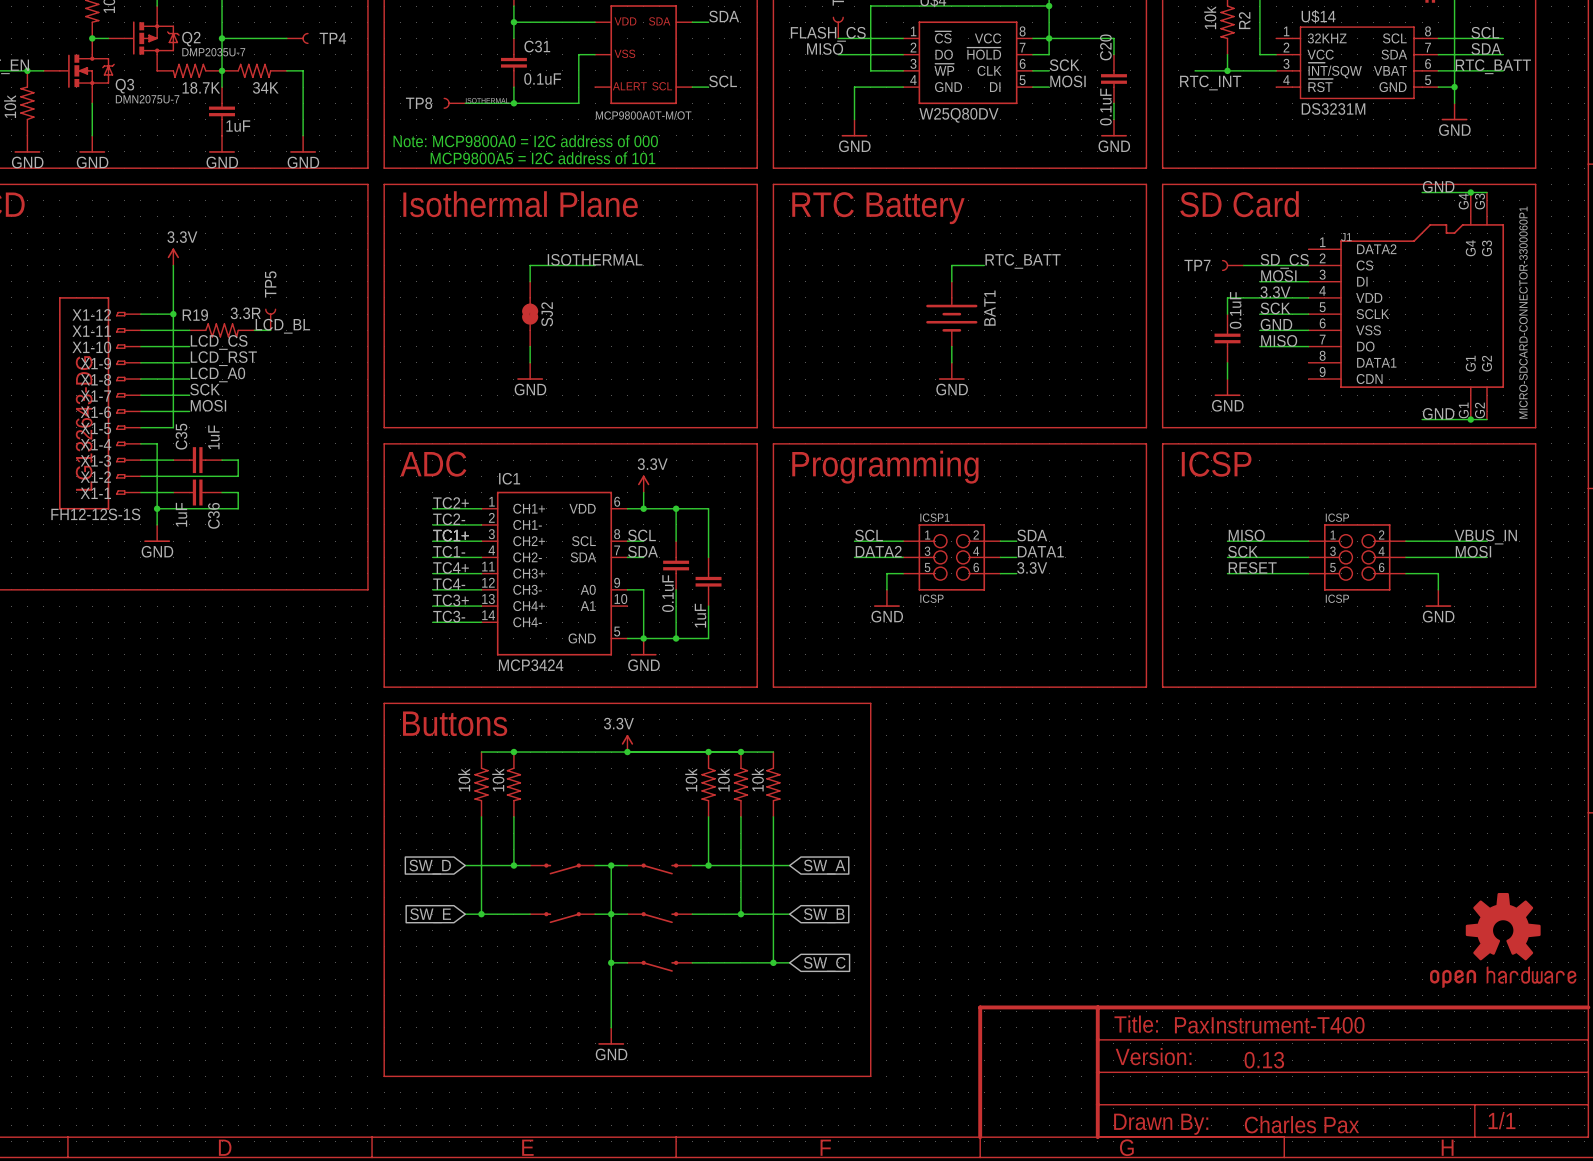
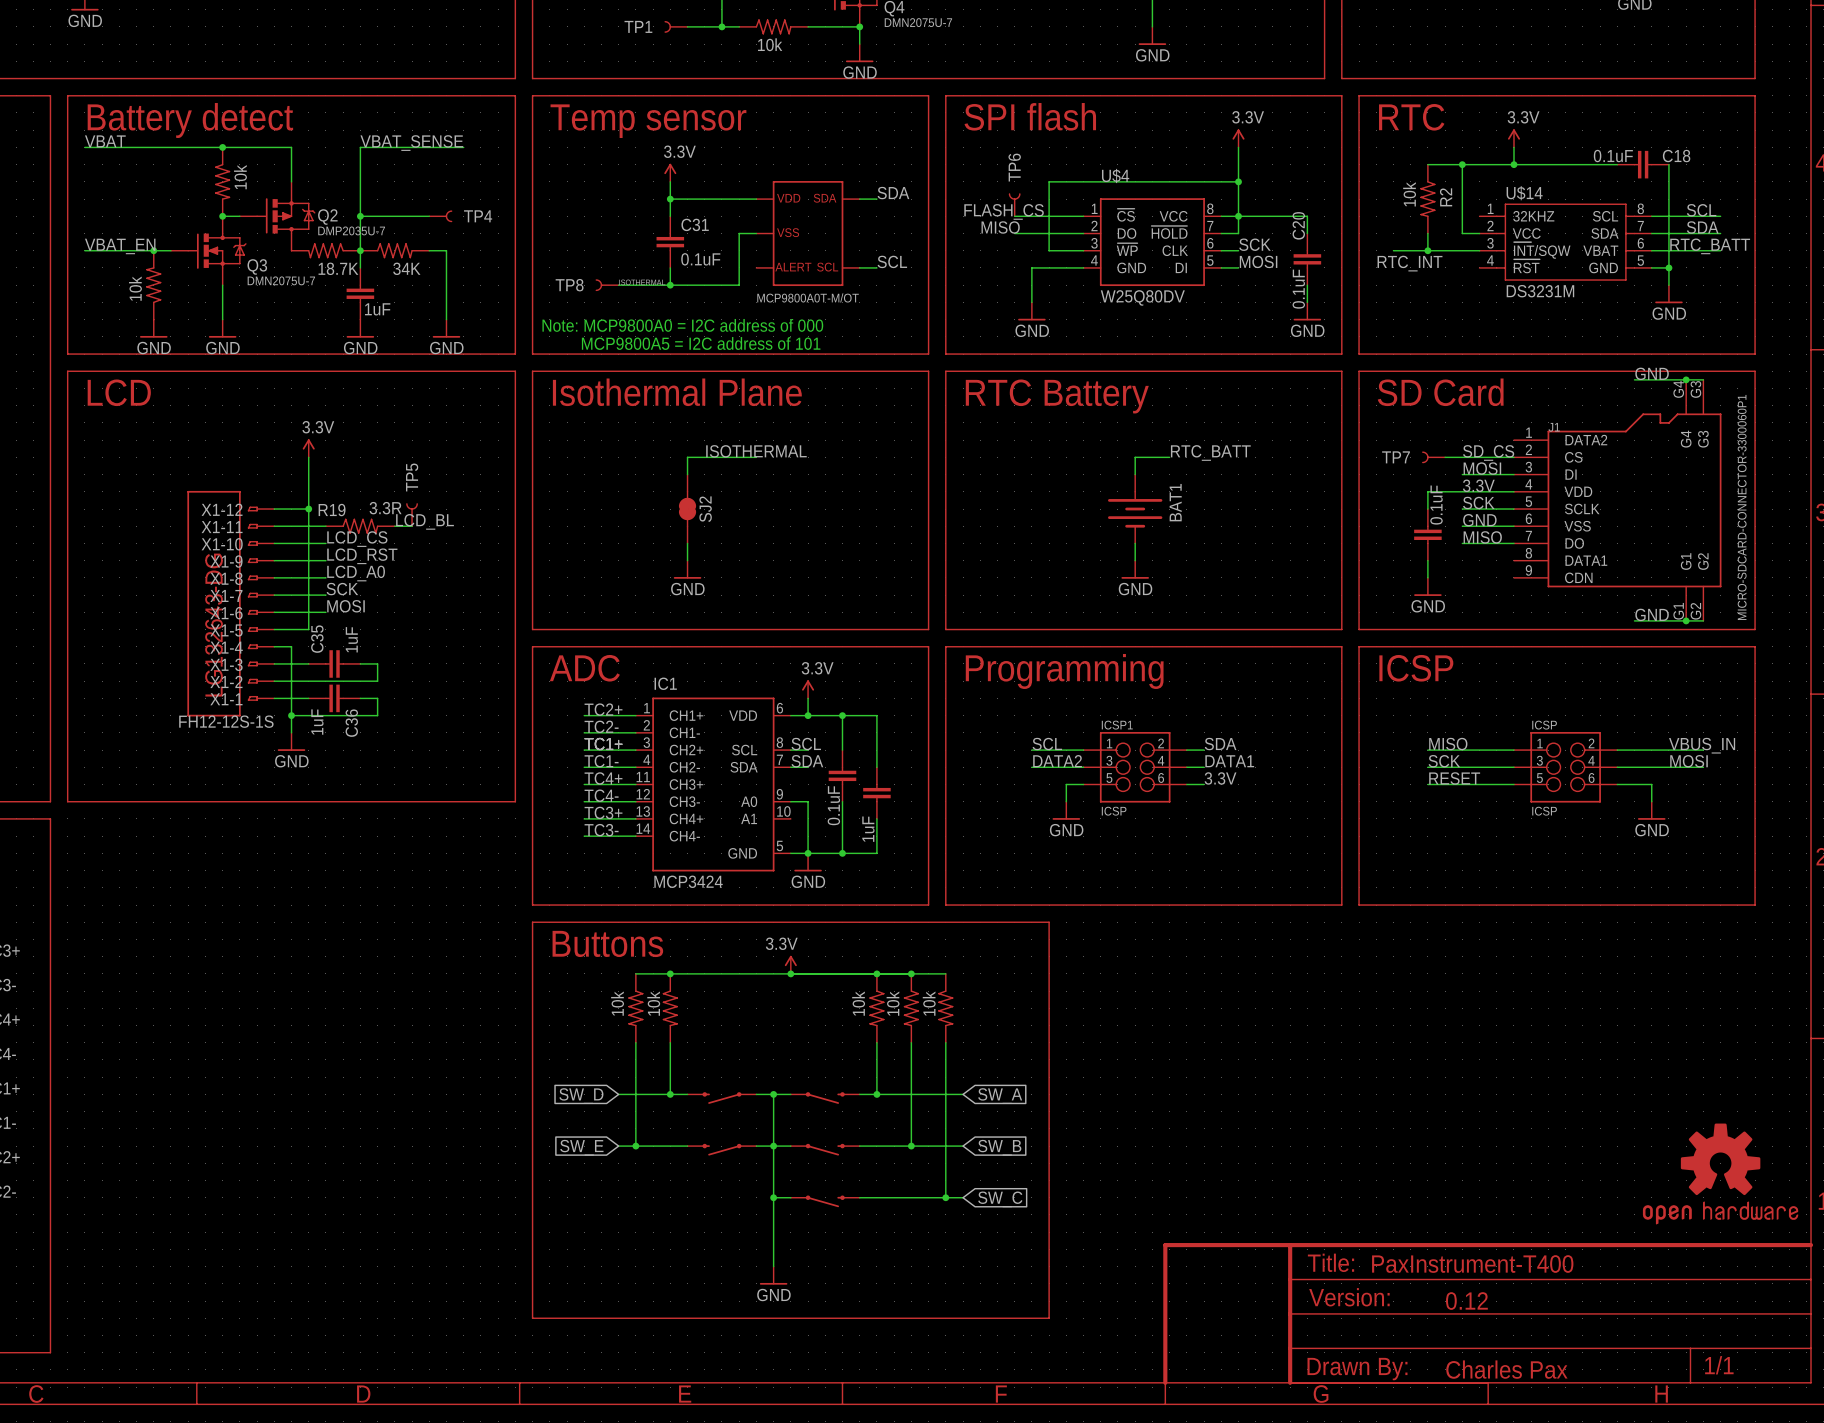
text: 0.13 (1264, 1060) -> 0.12 (1466, 1301)

